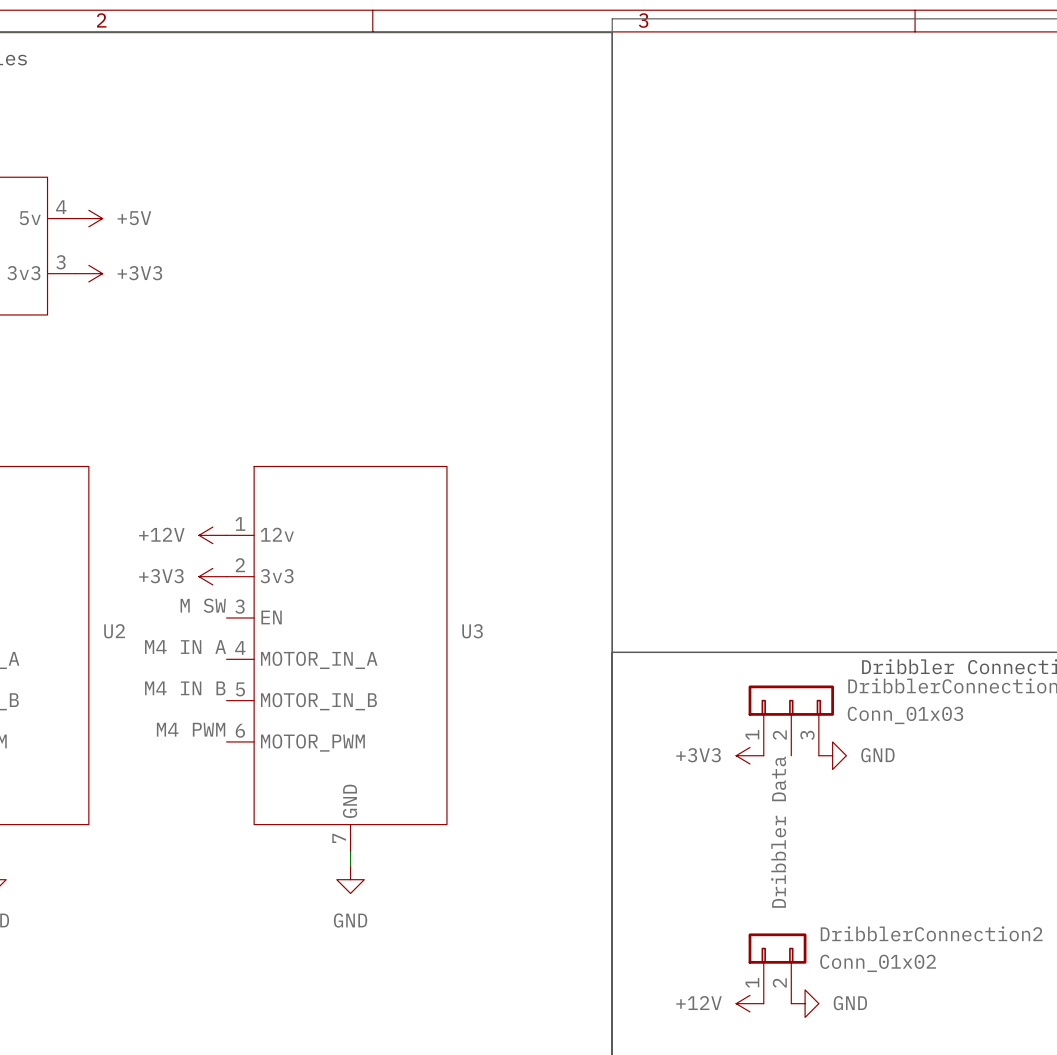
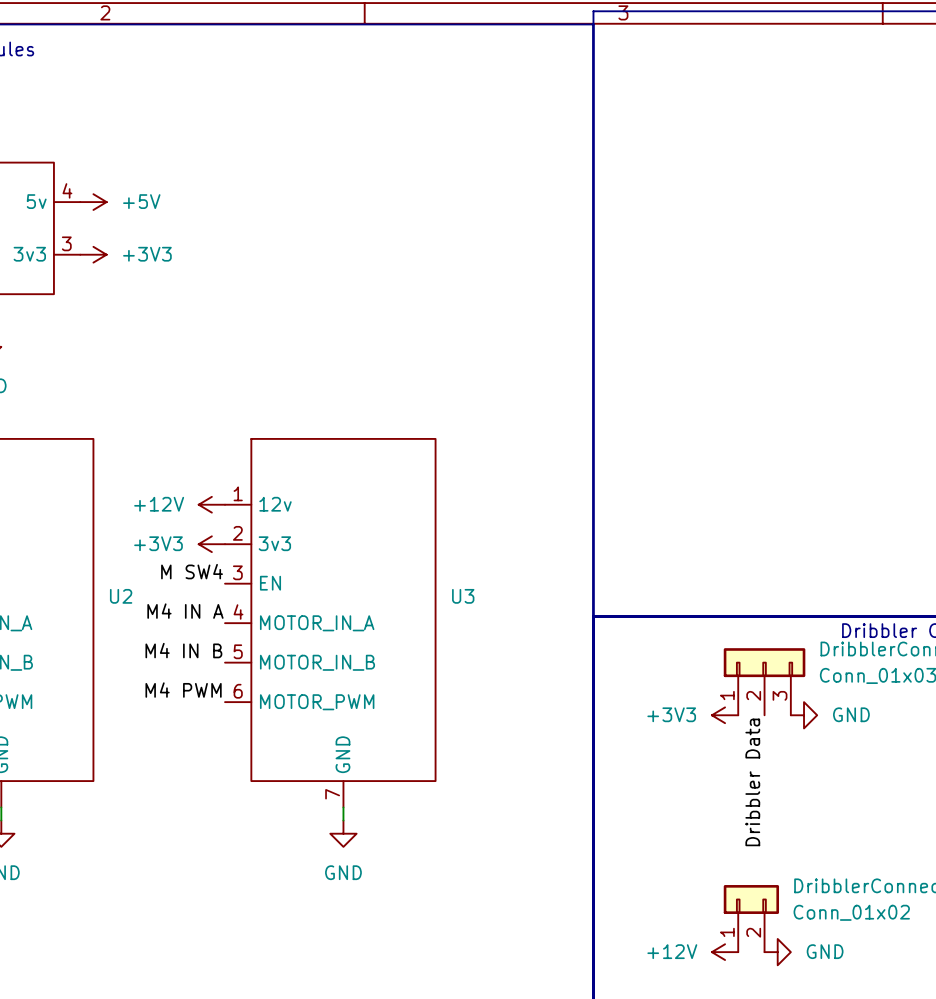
label: M SW (203, 605) -> M SW4 (192, 571)

